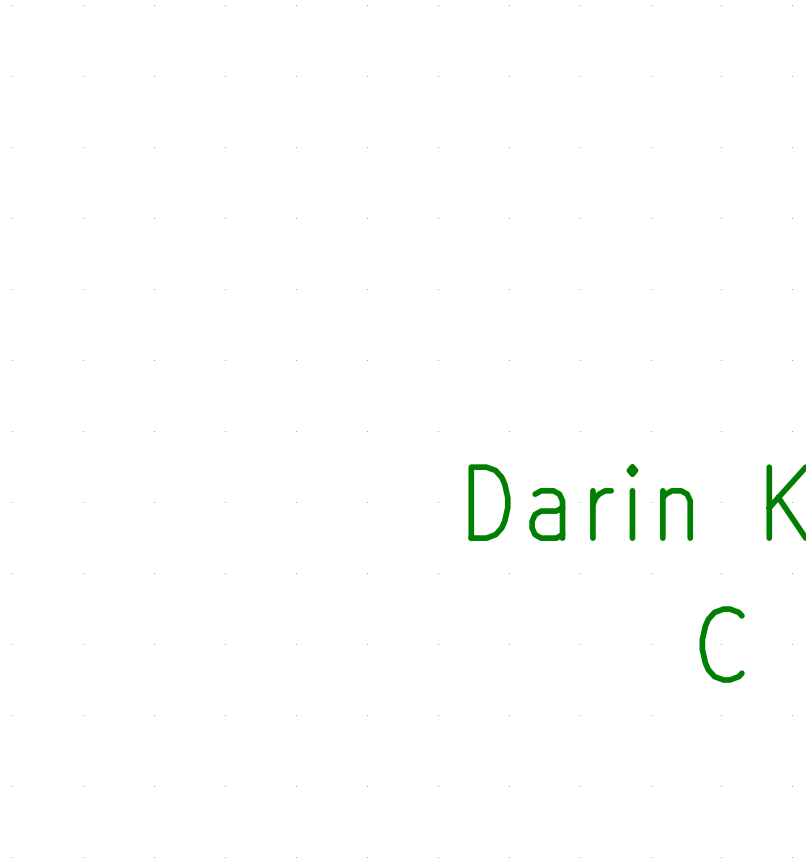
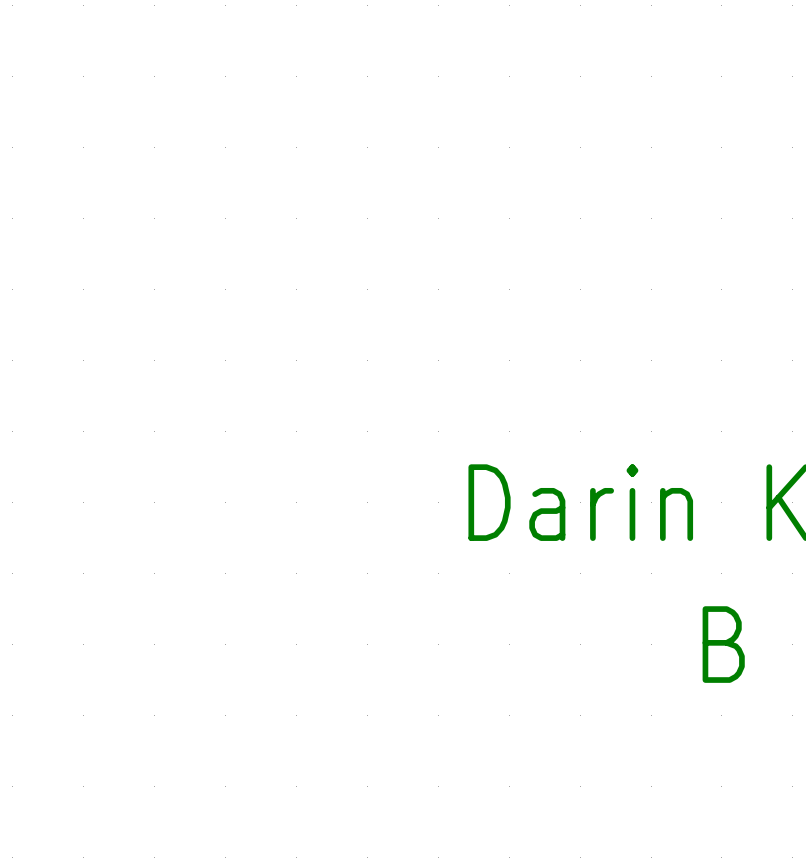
text: C (722, 644) -> B (723, 644)

